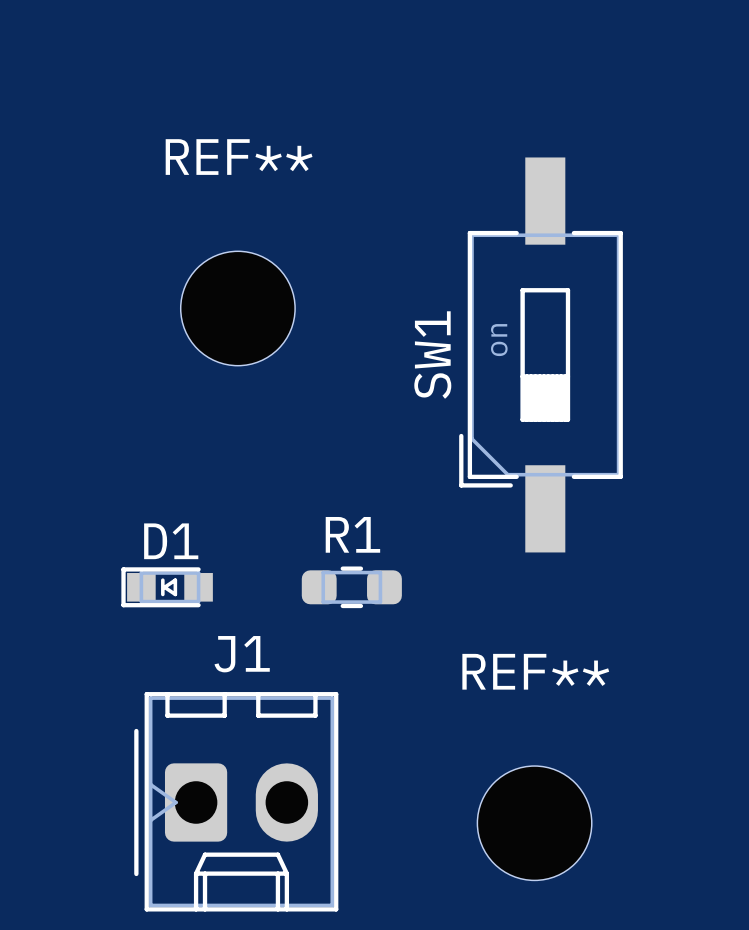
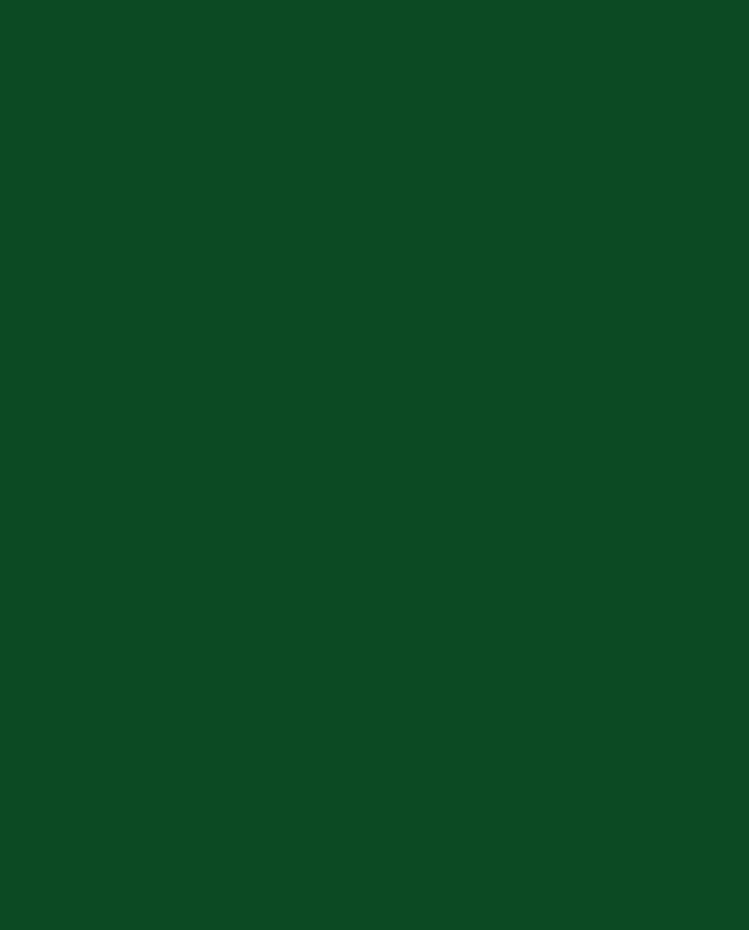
REF**: (237, 308) -> none
SW1: (541, 354) -> none
D1: (167, 587) -> none
R1: (351, 587) -> none
J1: (236, 801) -> none
REF**: (534, 823) -> none

